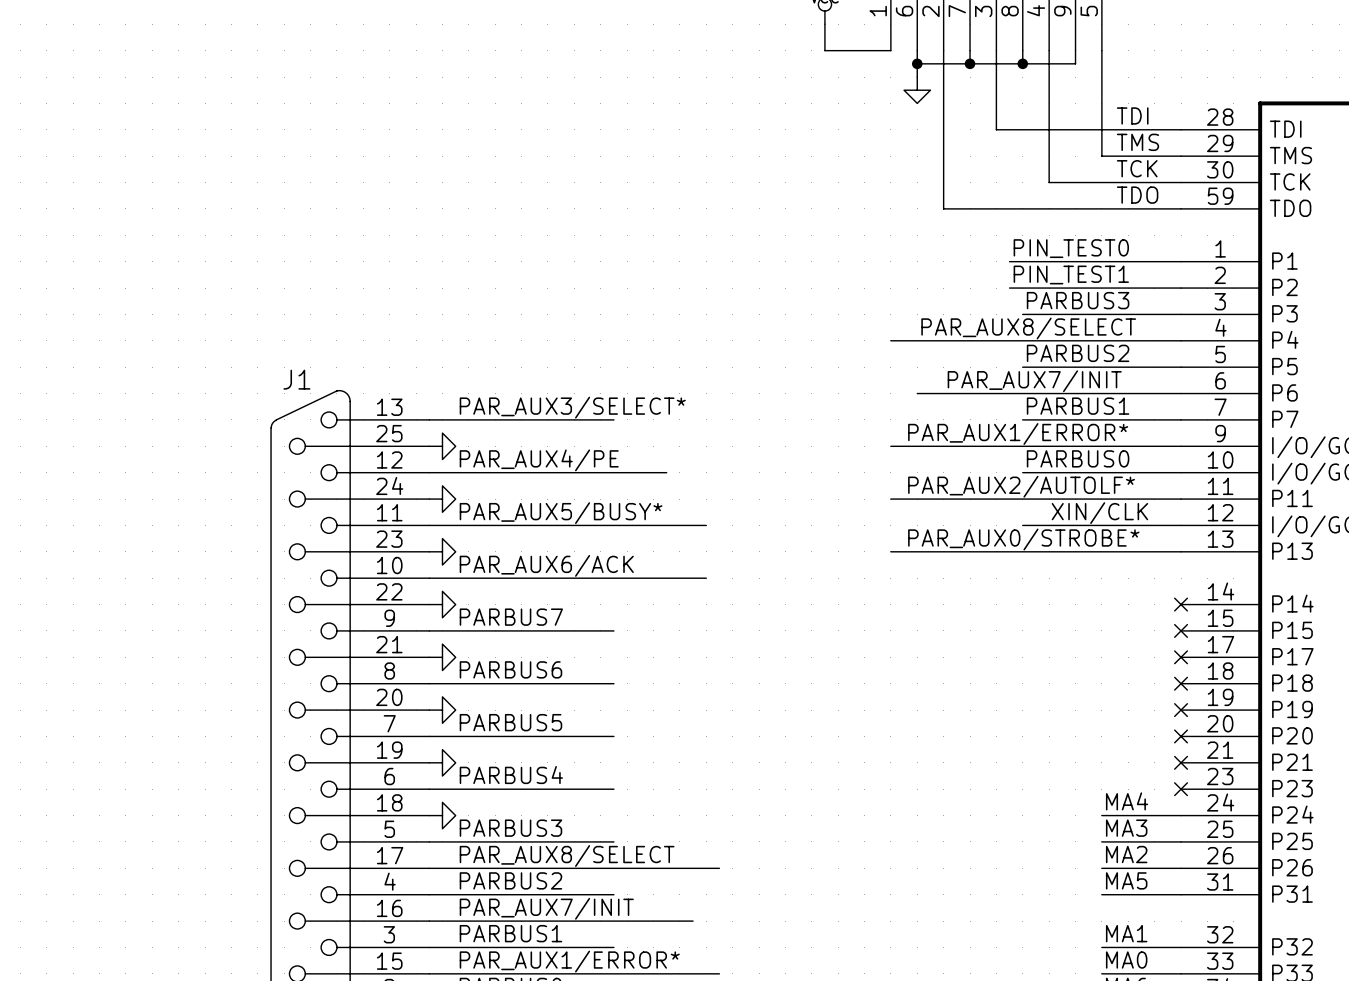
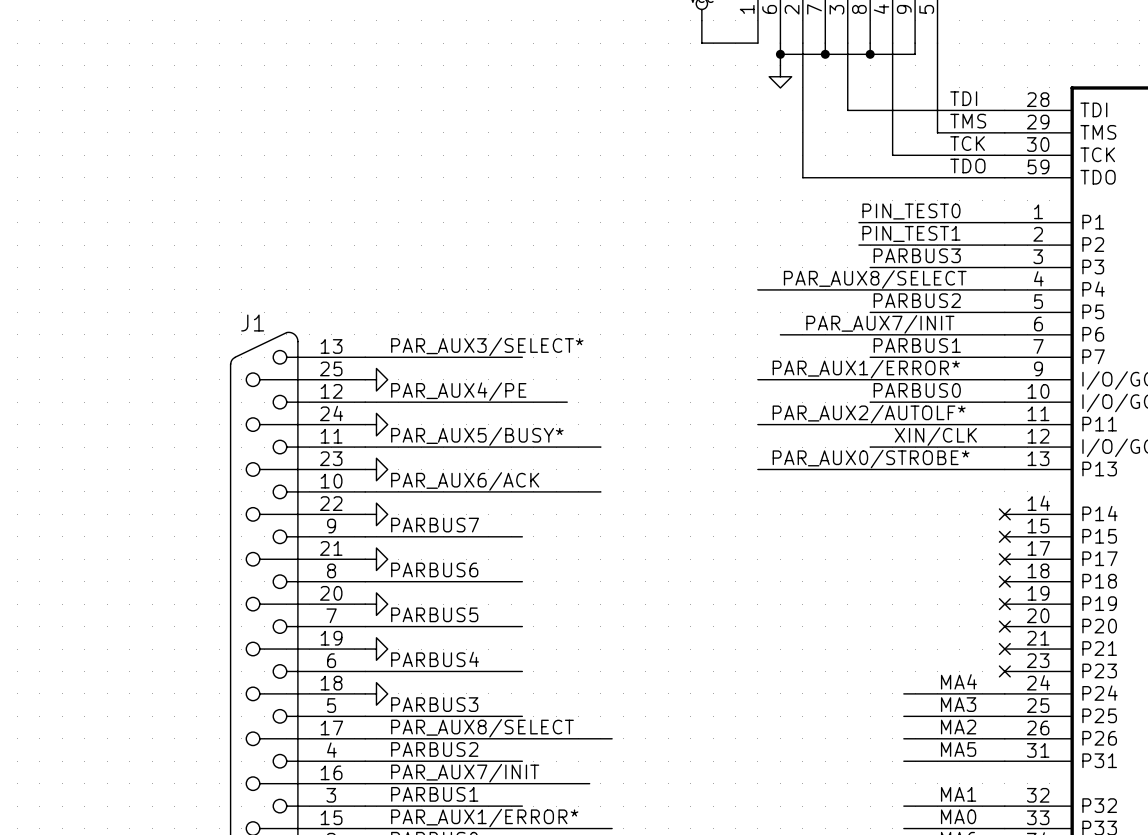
wire: none -> (903, 693) (937, 693)
wire: none -> (903, 716) (937, 716)
wire: none -> (903, 738) (937, 738)
wire: none -> (903, 761) (937, 761)
wire: none -> (903, 806) (937, 806)
wire: none -> (903, 828) (937, 828)

